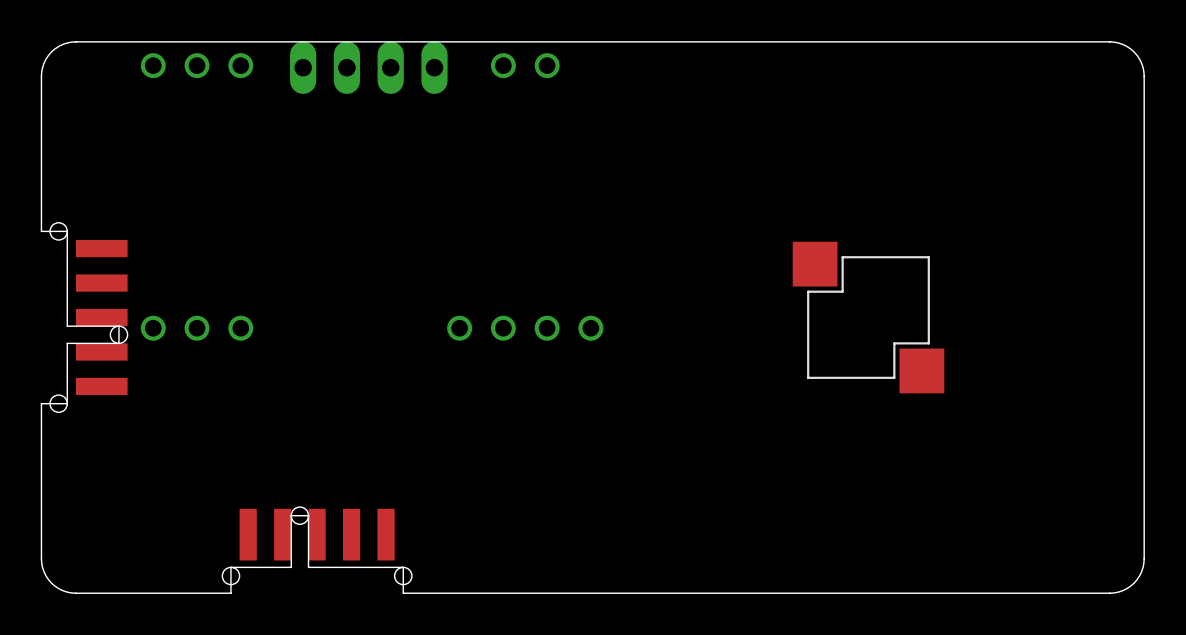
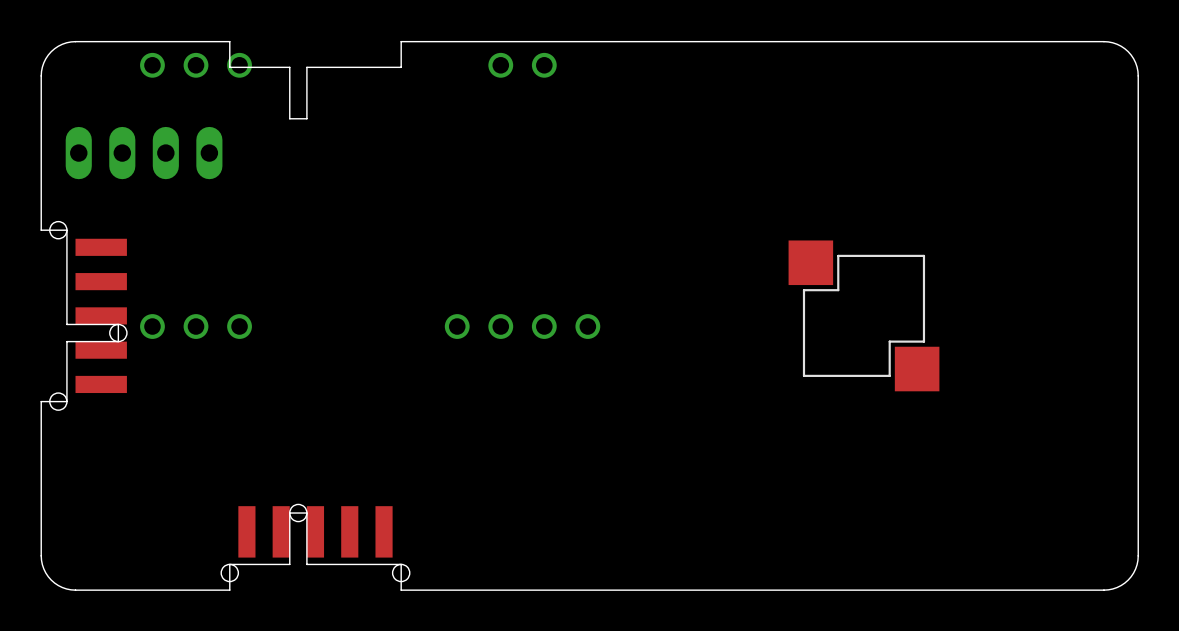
board edge: (230, 41) (403, 41) -> (229, 41) (229, 67) (289, 67) (289, 118) (306, 118) (306, 67) (401, 67) (401, 41)
part position: (368, 67) -> (144, 153)

